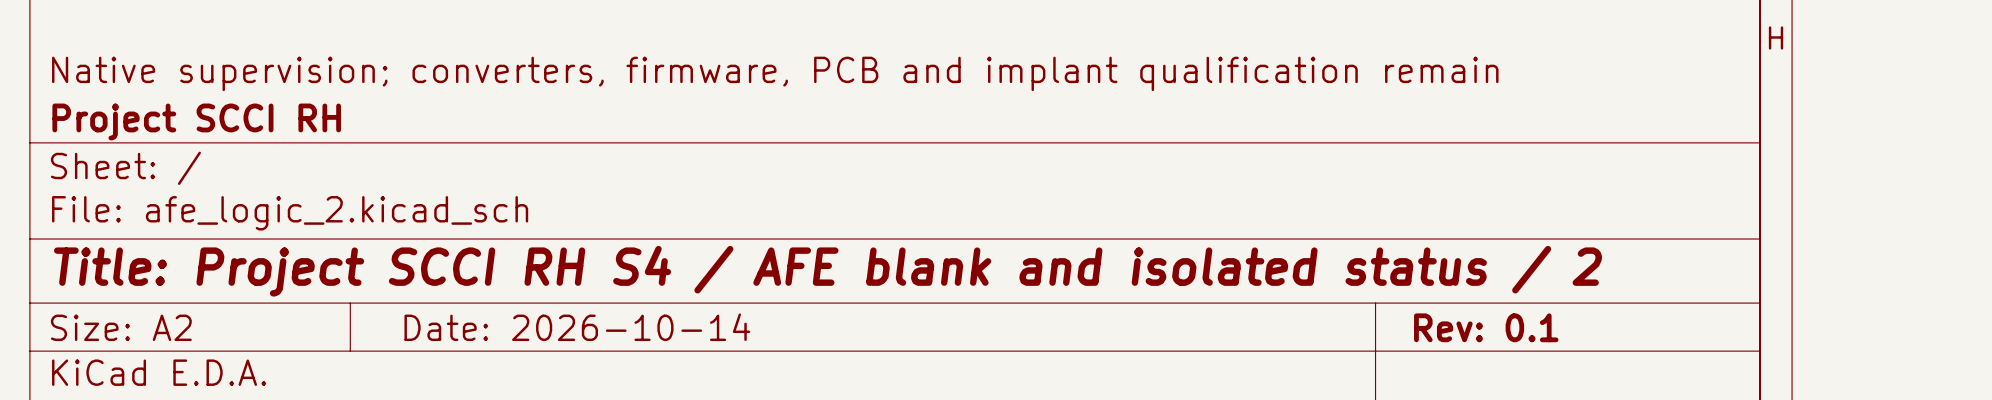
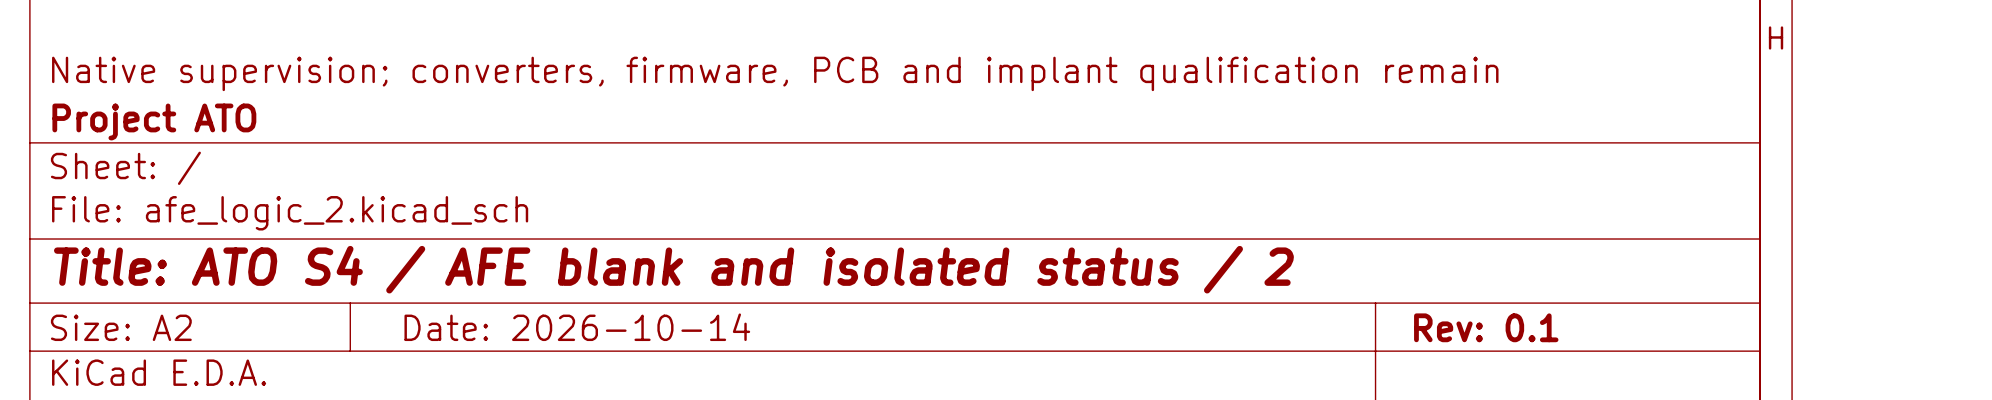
title block: Project SCCI RH (196, 121) -> Project ATO (154, 121)
title block: Title: Project SCCI RH S4 / AFE blank and isolated status / 2 (828, 271) -> Title: ATO S4 / AFE blank and isolated status / 2 (673, 269)

